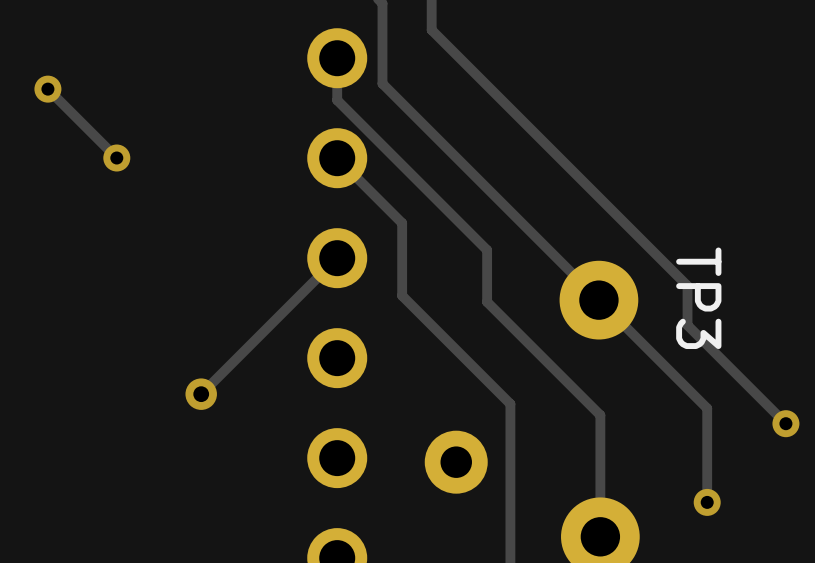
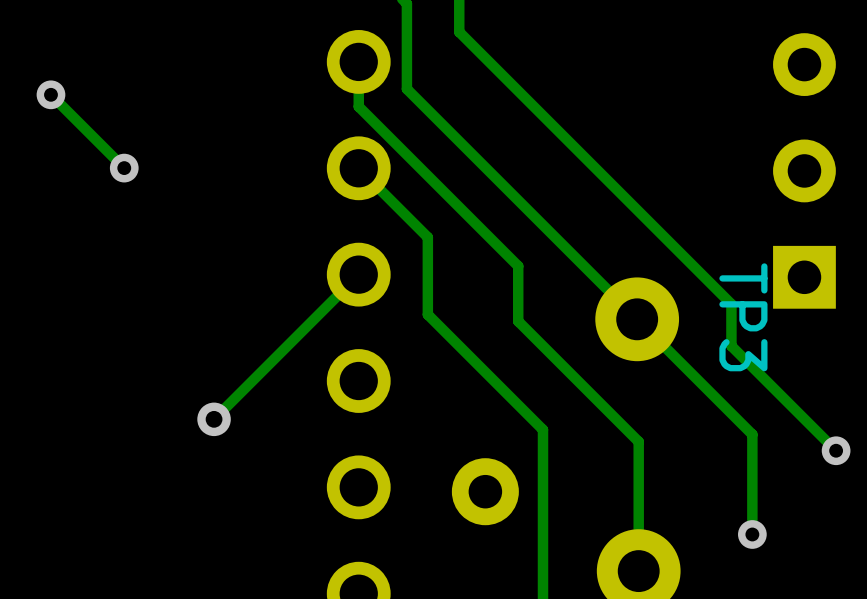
part: none -> (804, 170)

